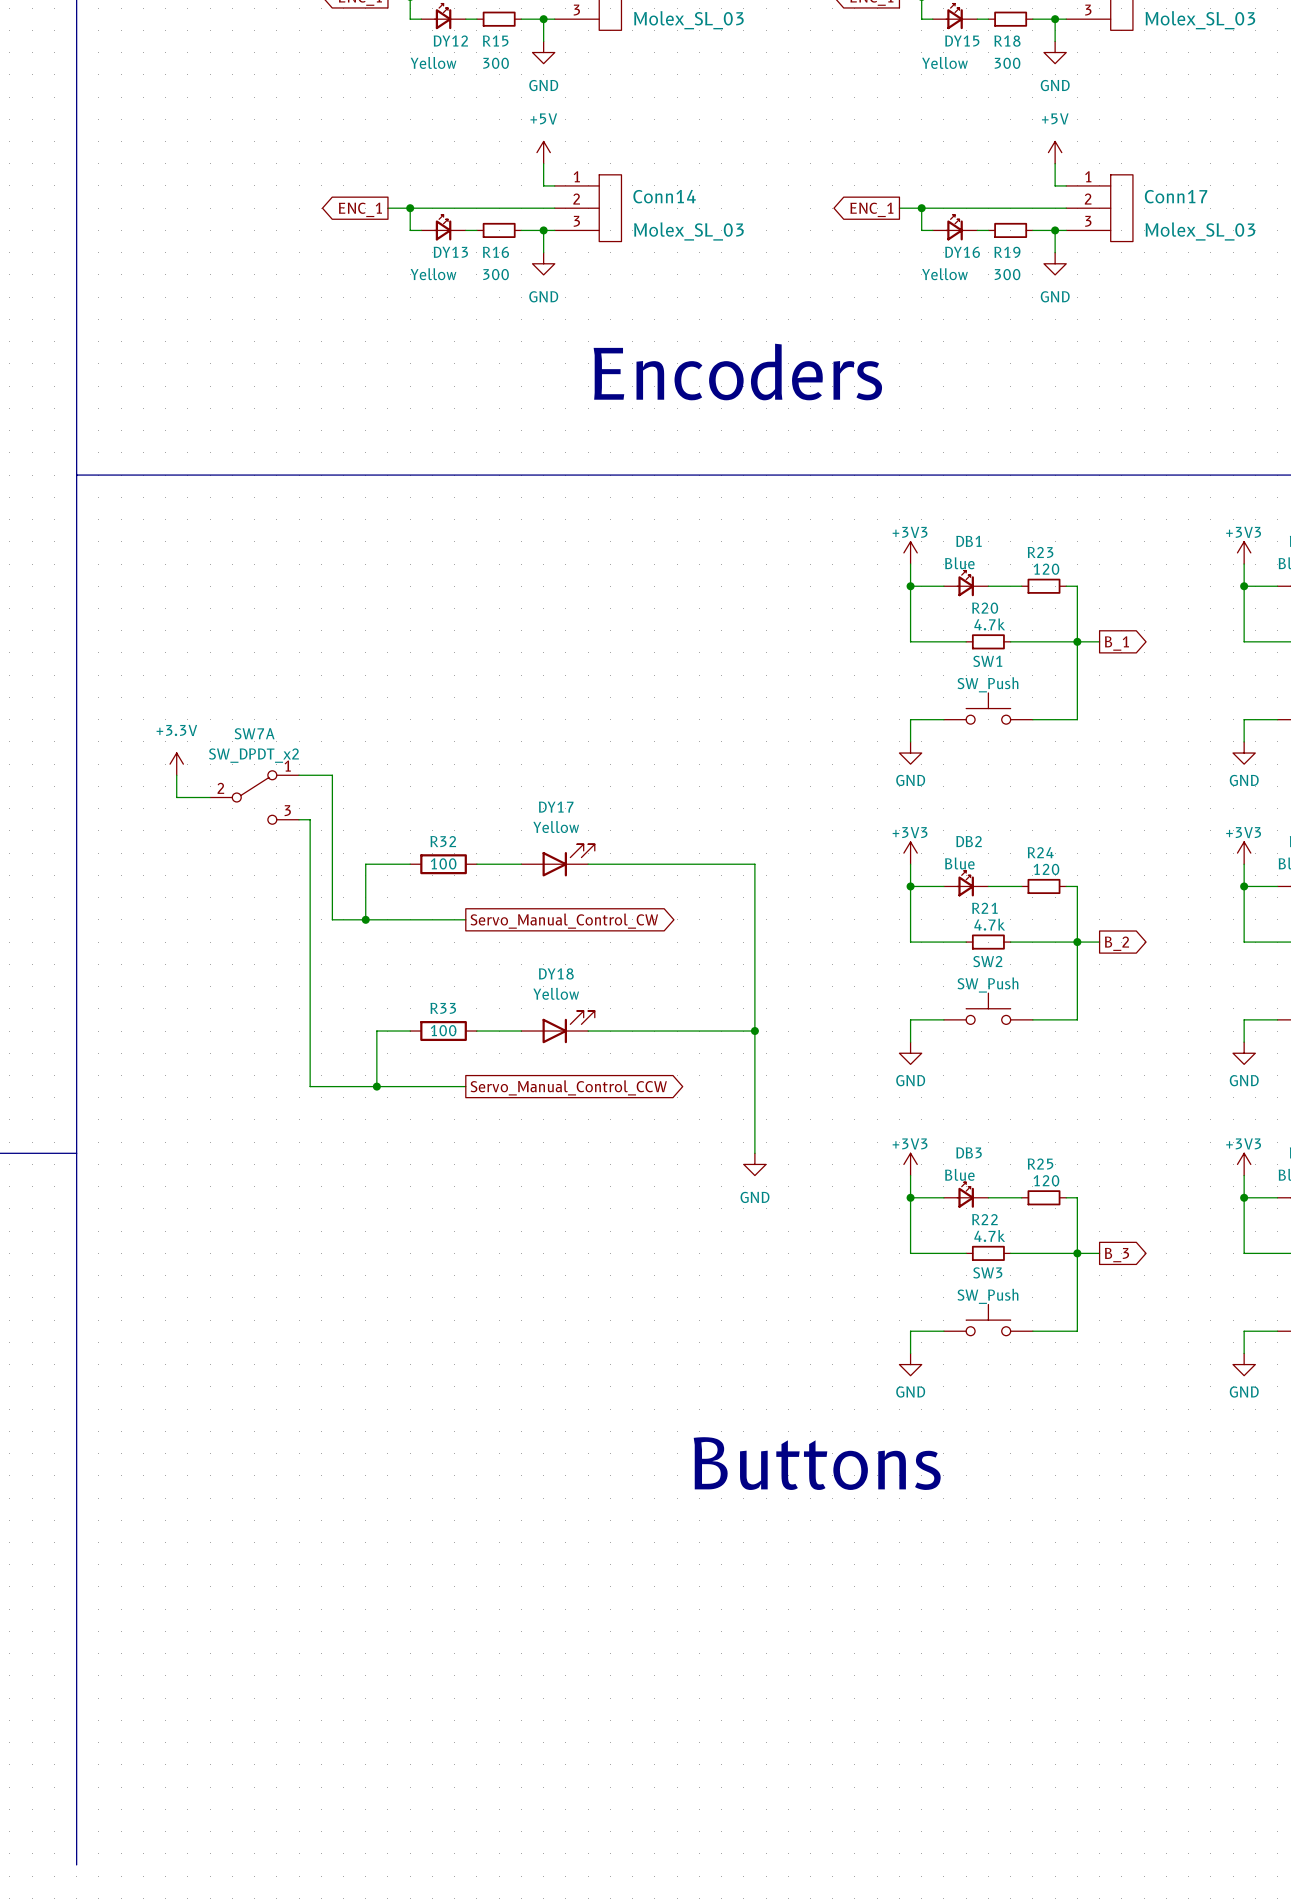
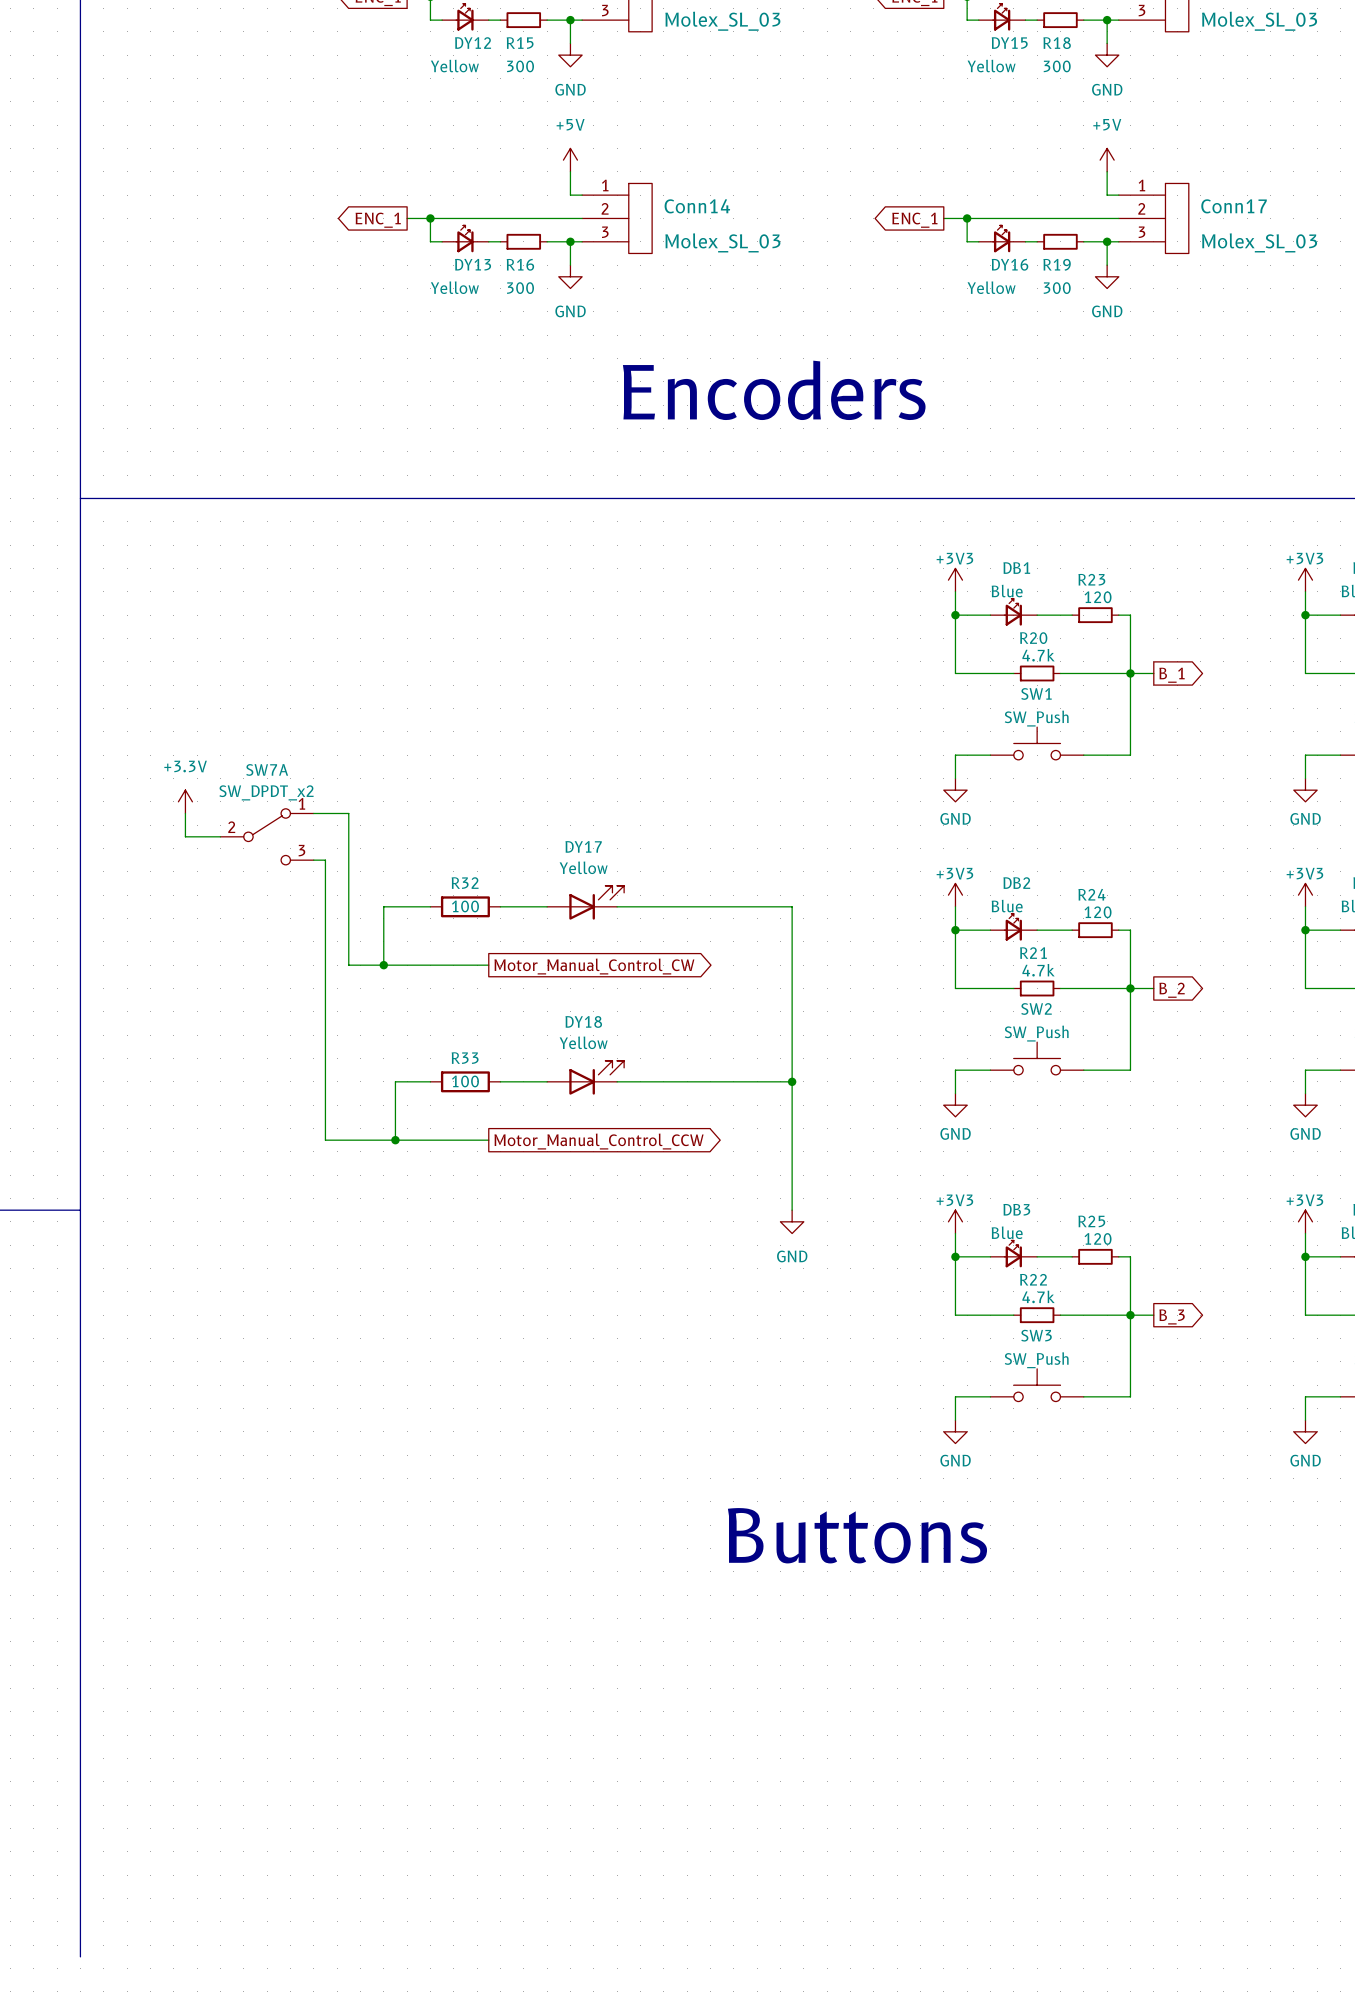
global label: Servo_Manual_Control_CW (564, 921) -> Motor_Manual_Control_CW (594, 966)
global label: Servo_Manual_Control_CCW (568, 1087) -> Motor_Manual_Control_CCW (599, 1141)

